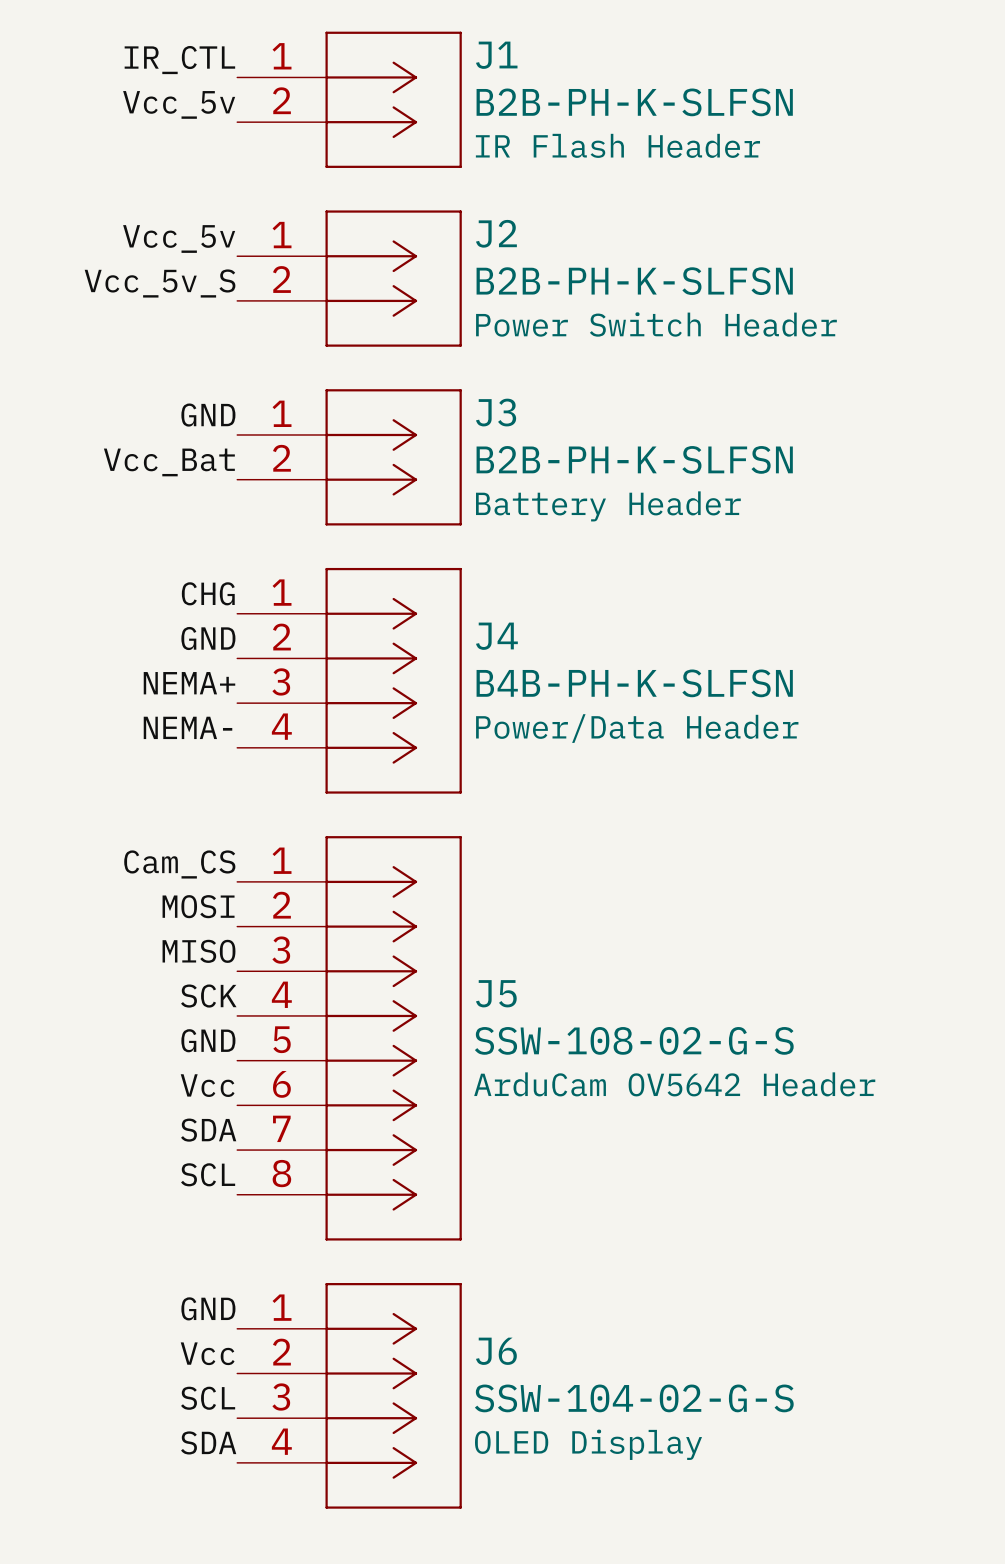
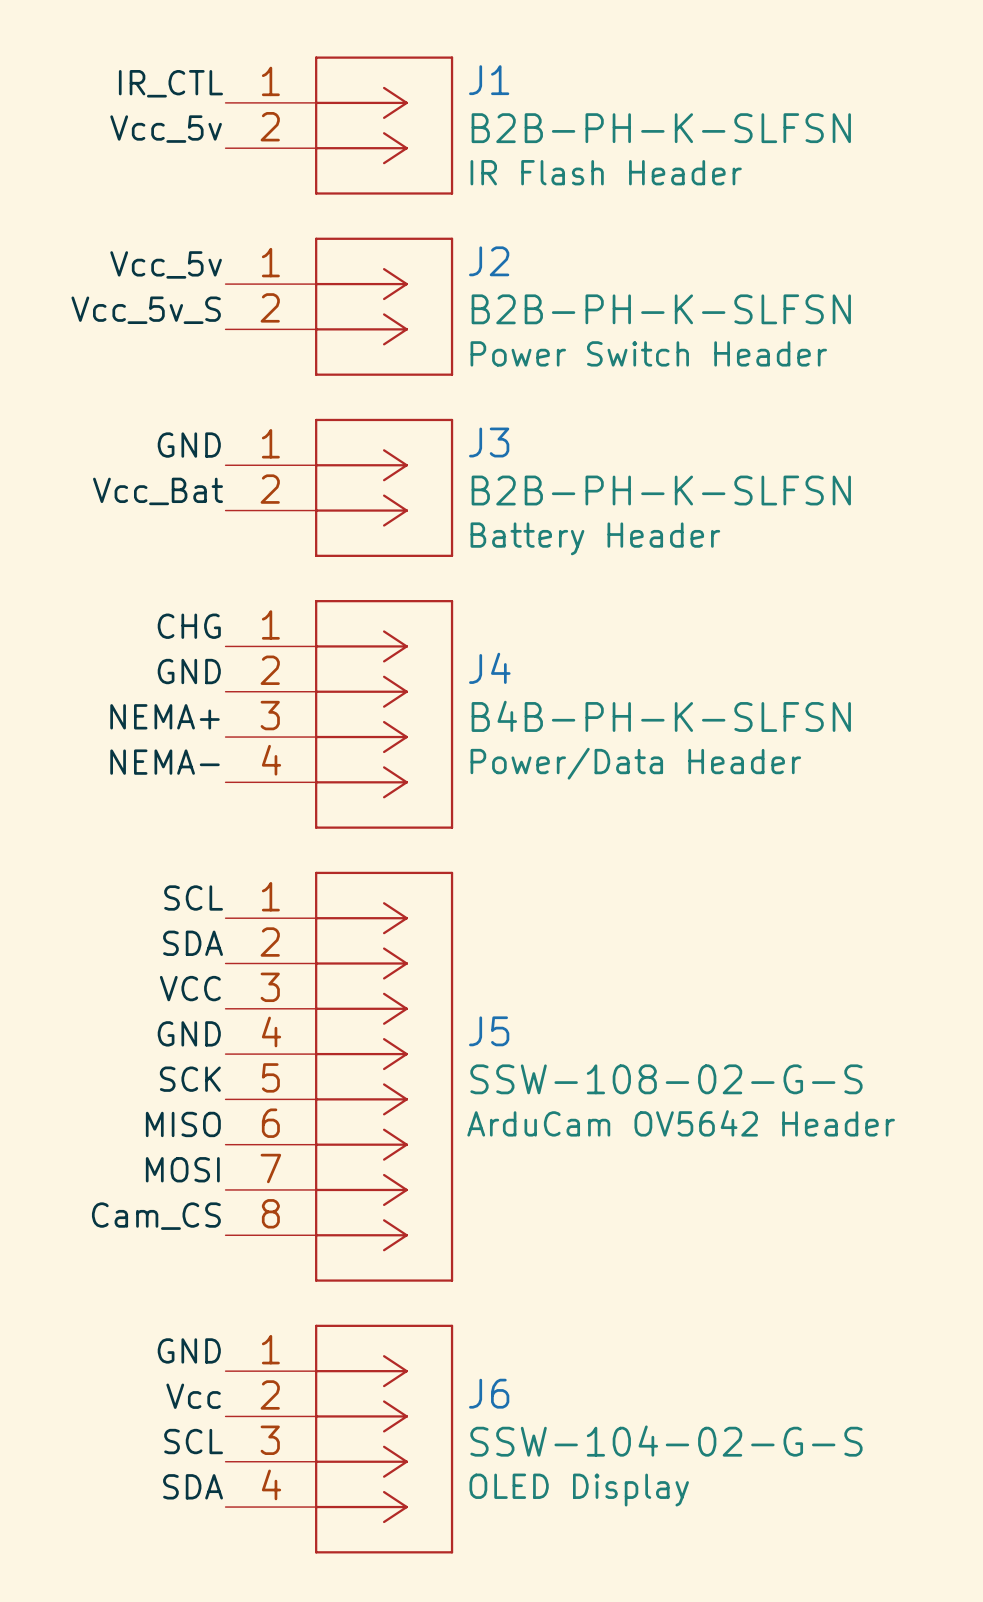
label: Cam_CS (179, 864) -> SCL (193, 897)
label: MOSI (198, 906) -> SDA (193, 943)
label: MISO (199, 951) -> VCC (190, 988)
label: SCK (208, 996) -> GND (189, 1033)
label: GND (208, 1040) -> SCK (190, 1079)
label: Vcc (207, 1085) -> MISO (183, 1124)
label: SDA (208, 1130) -> MOSI (182, 1169)
label: SCL (208, 1174) -> Cam_CS (156, 1216)

